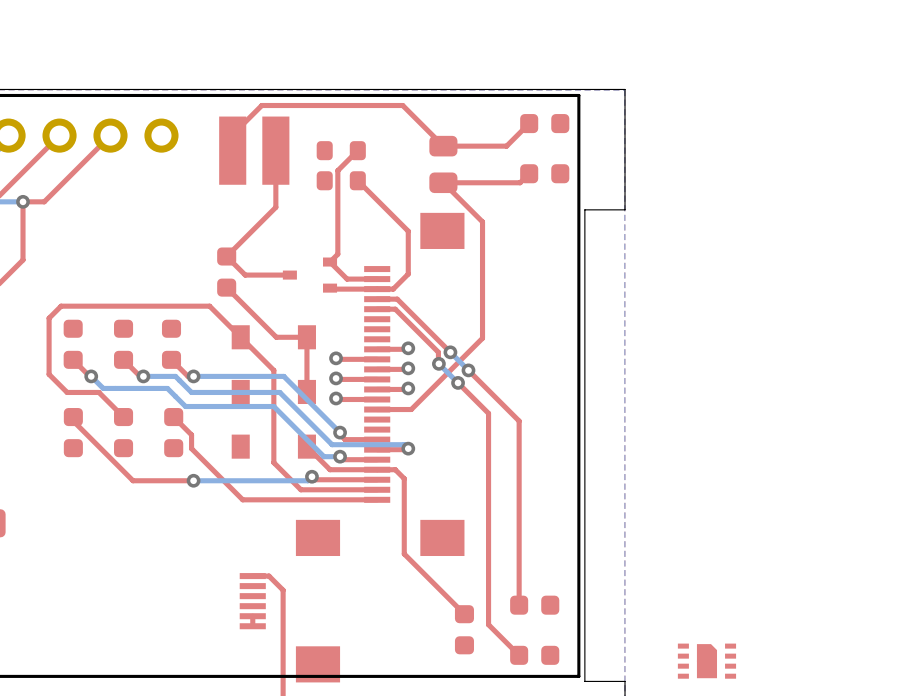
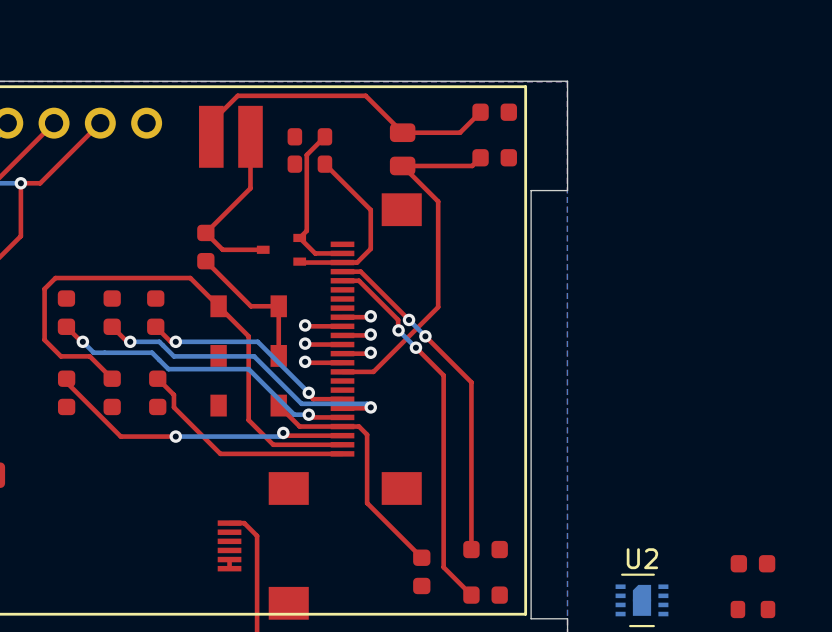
part: none -> (752, 563)
U2 side: top (706, 661) -> bottom (641, 600)
part: none -> (752, 609)

